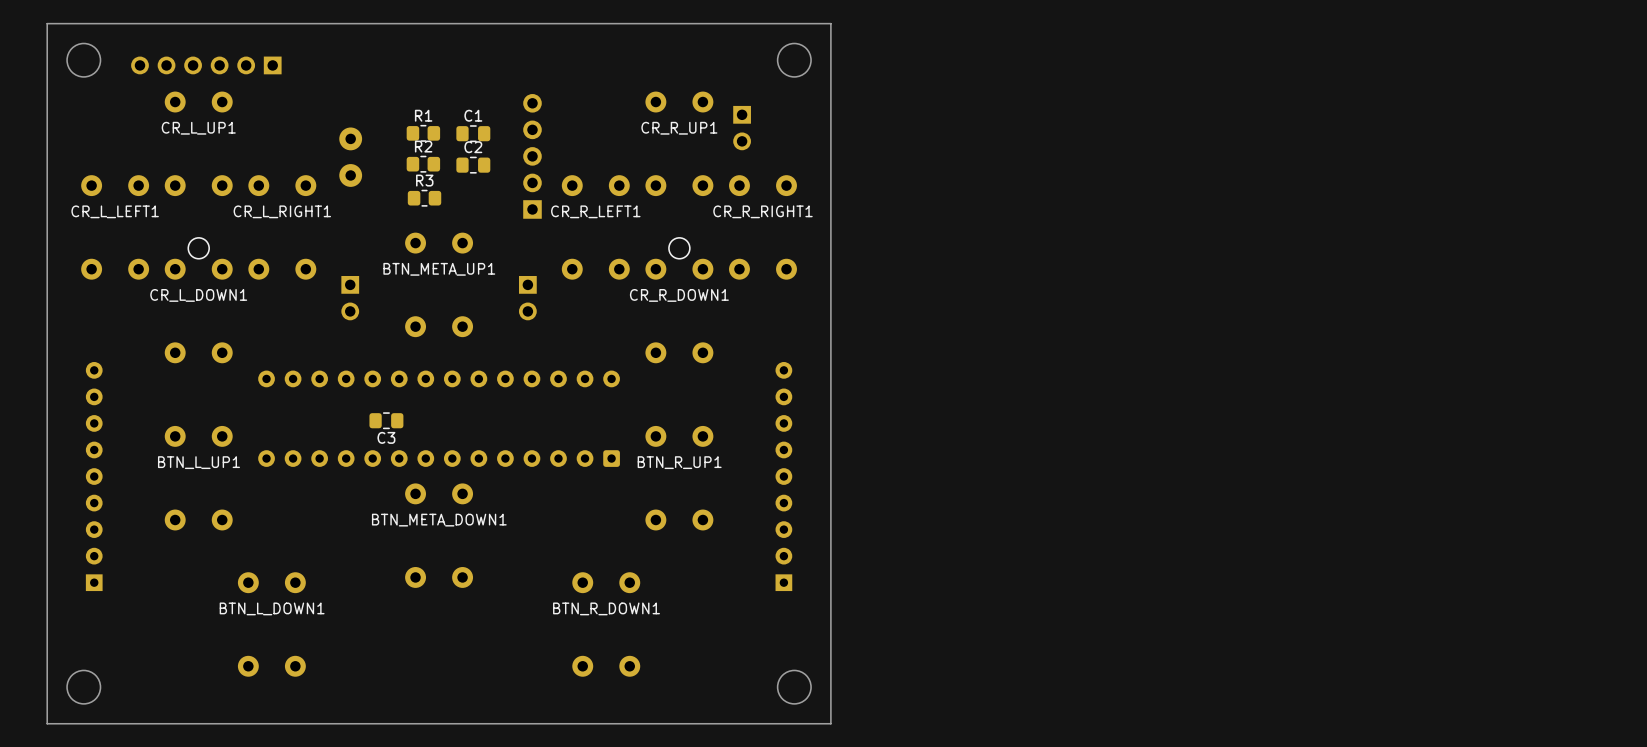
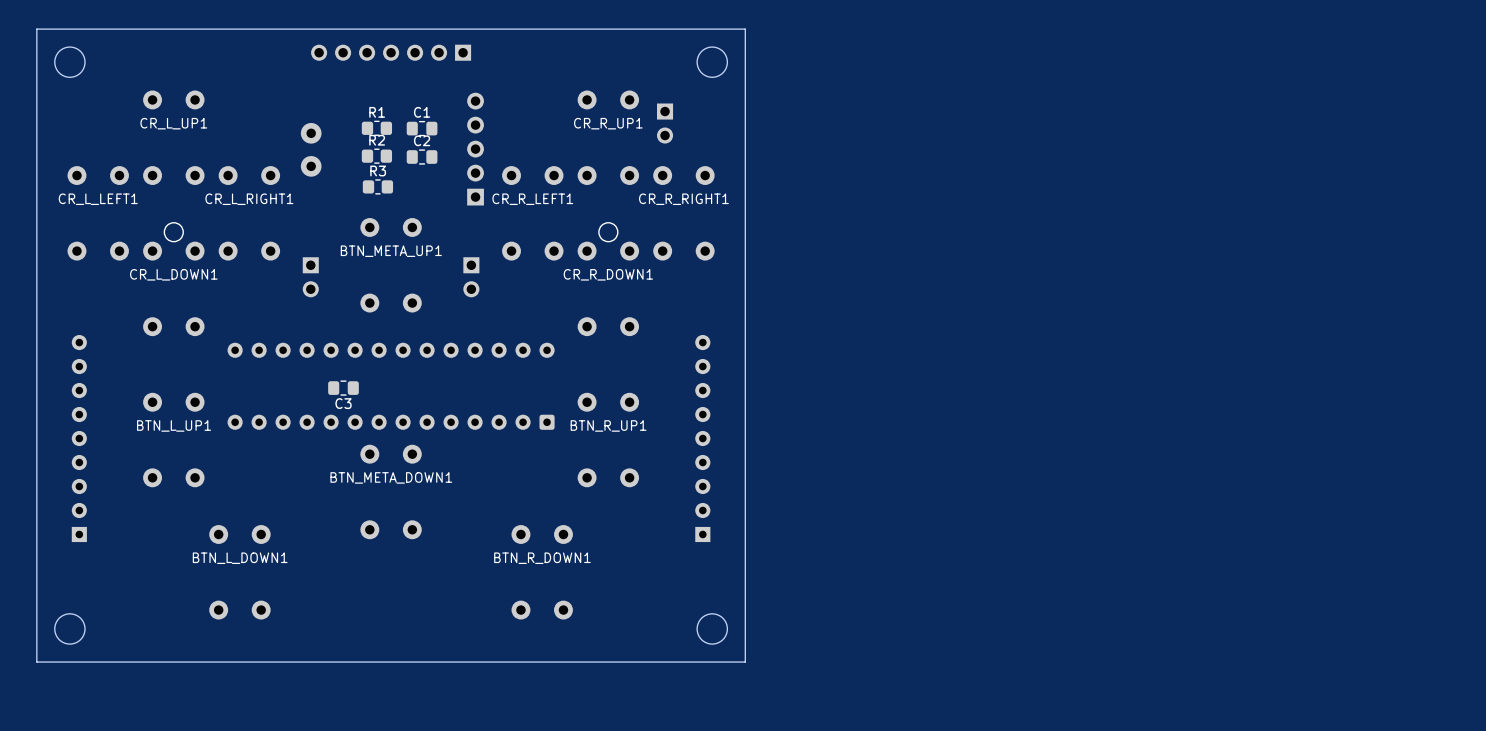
part: none -> (391, 52)
part: (206, 65) -> none

